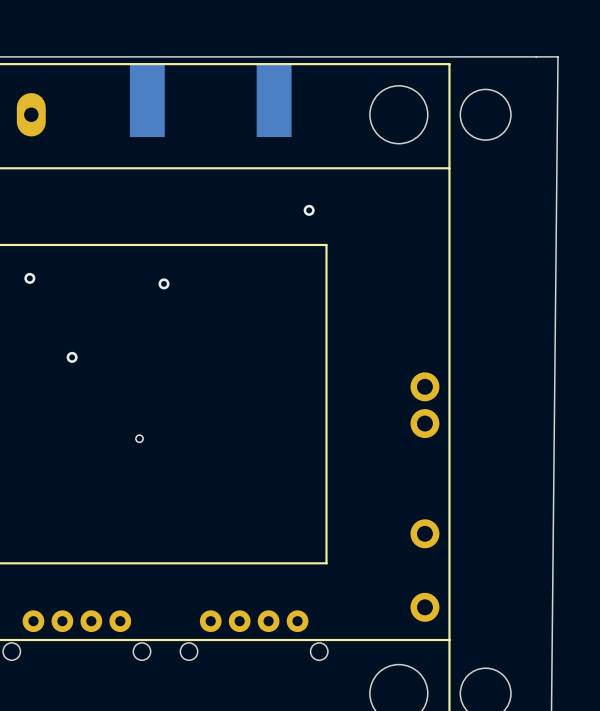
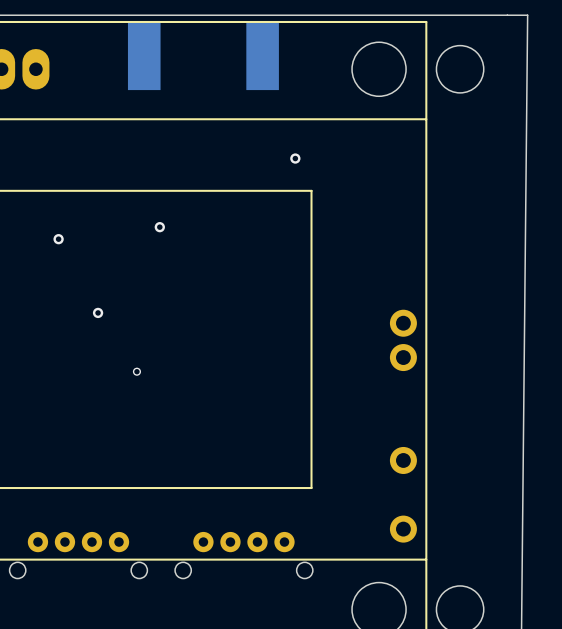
via: (29, 278) -> none
via: none -> (58, 239)
via: (72, 357) -> none
via: none -> (98, 312)

